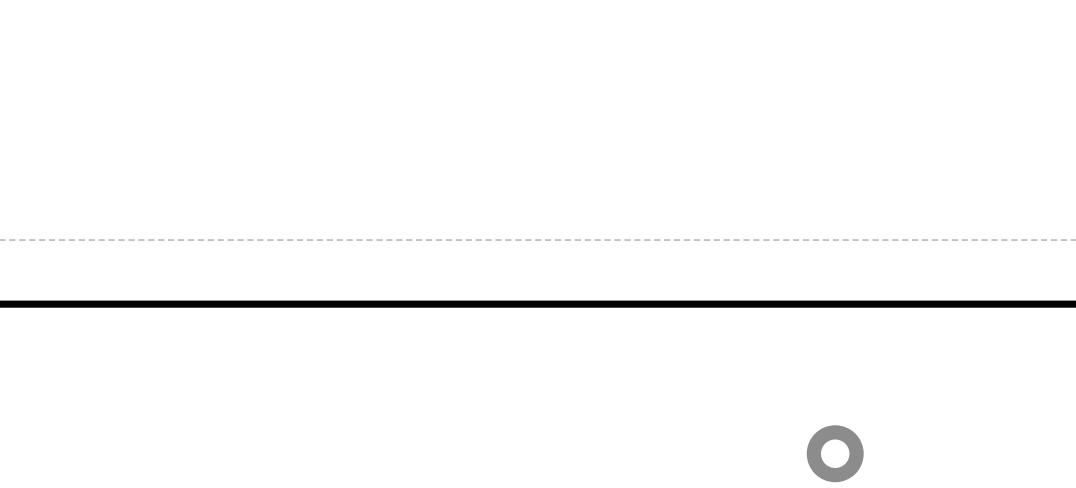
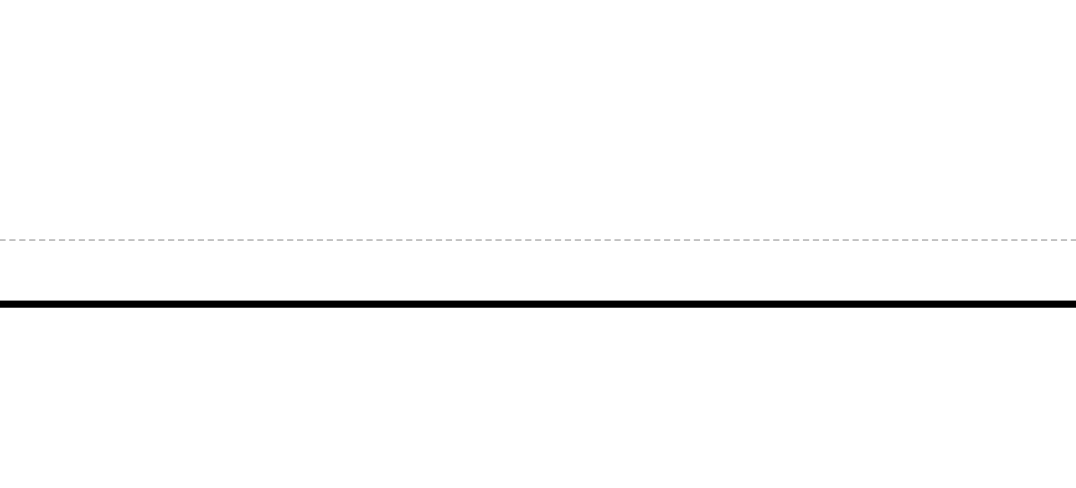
via: (835, 453) -> none

